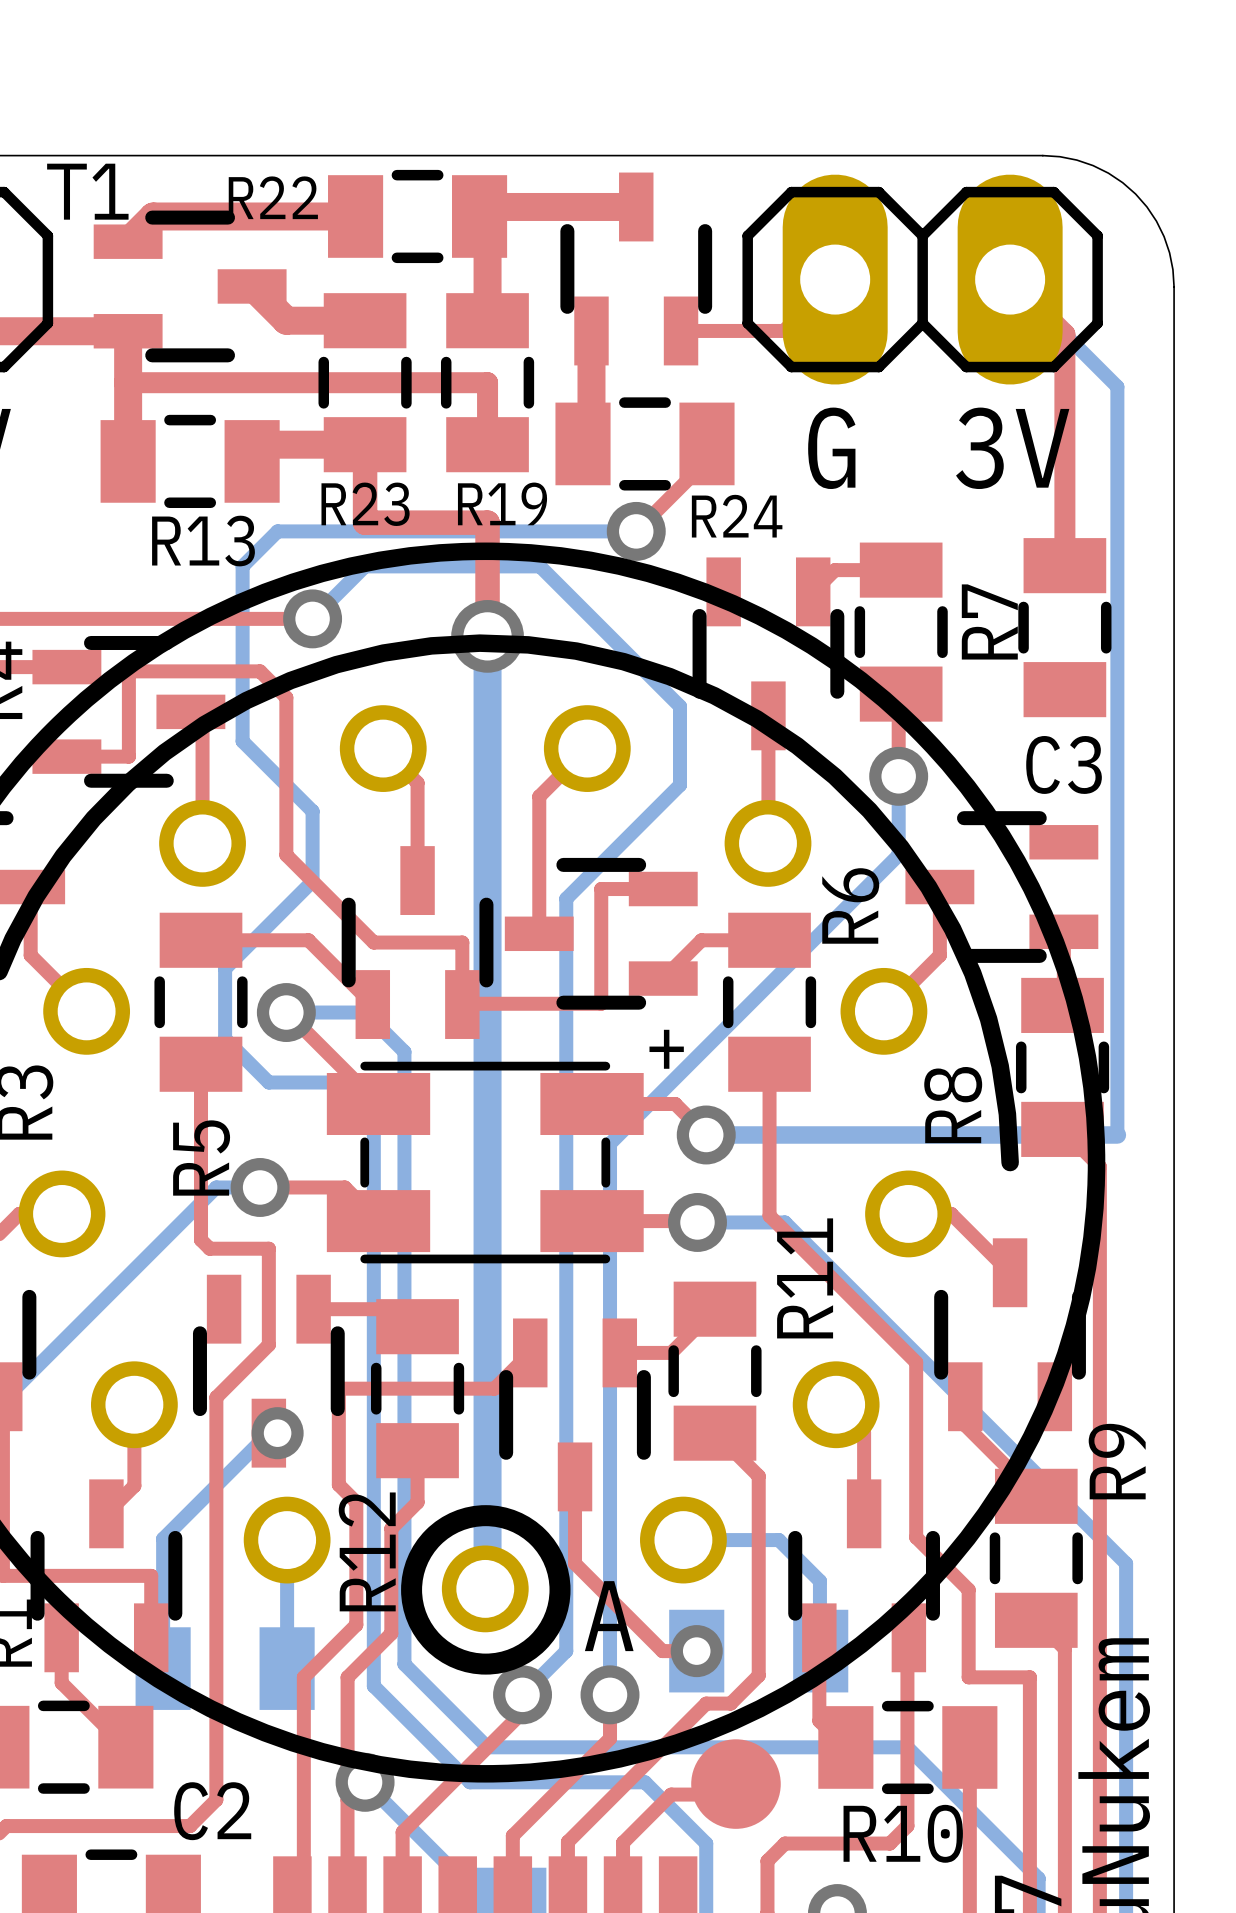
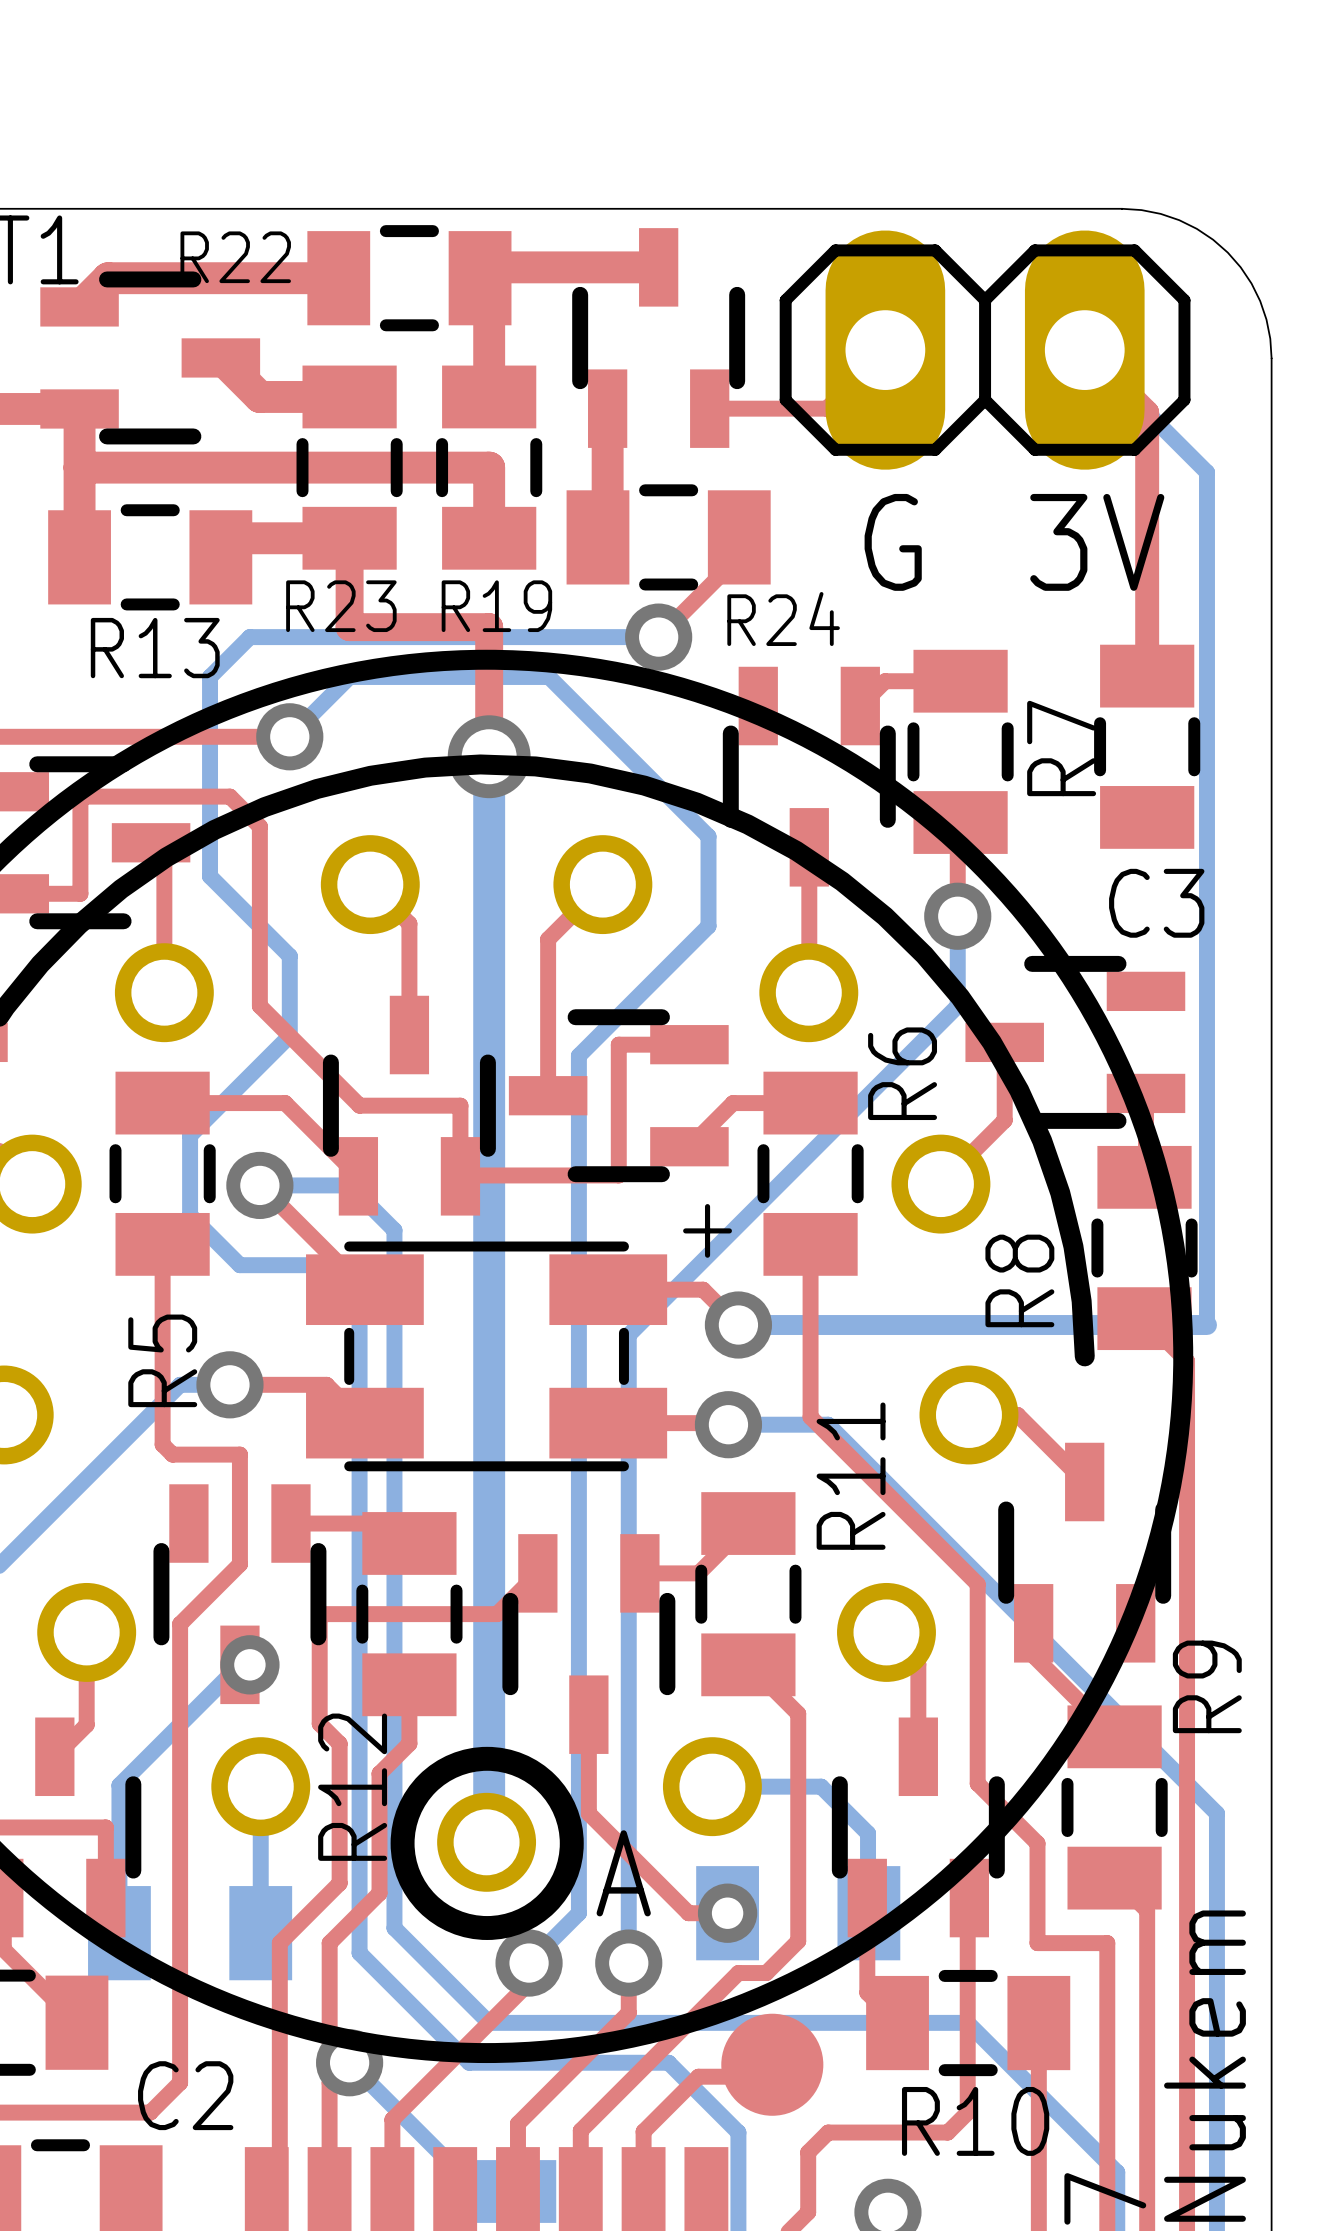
top track width: thin (128, 382) (487, 382) (487, 444) -> thick (79, 467) (489, 467) (489, 538)

